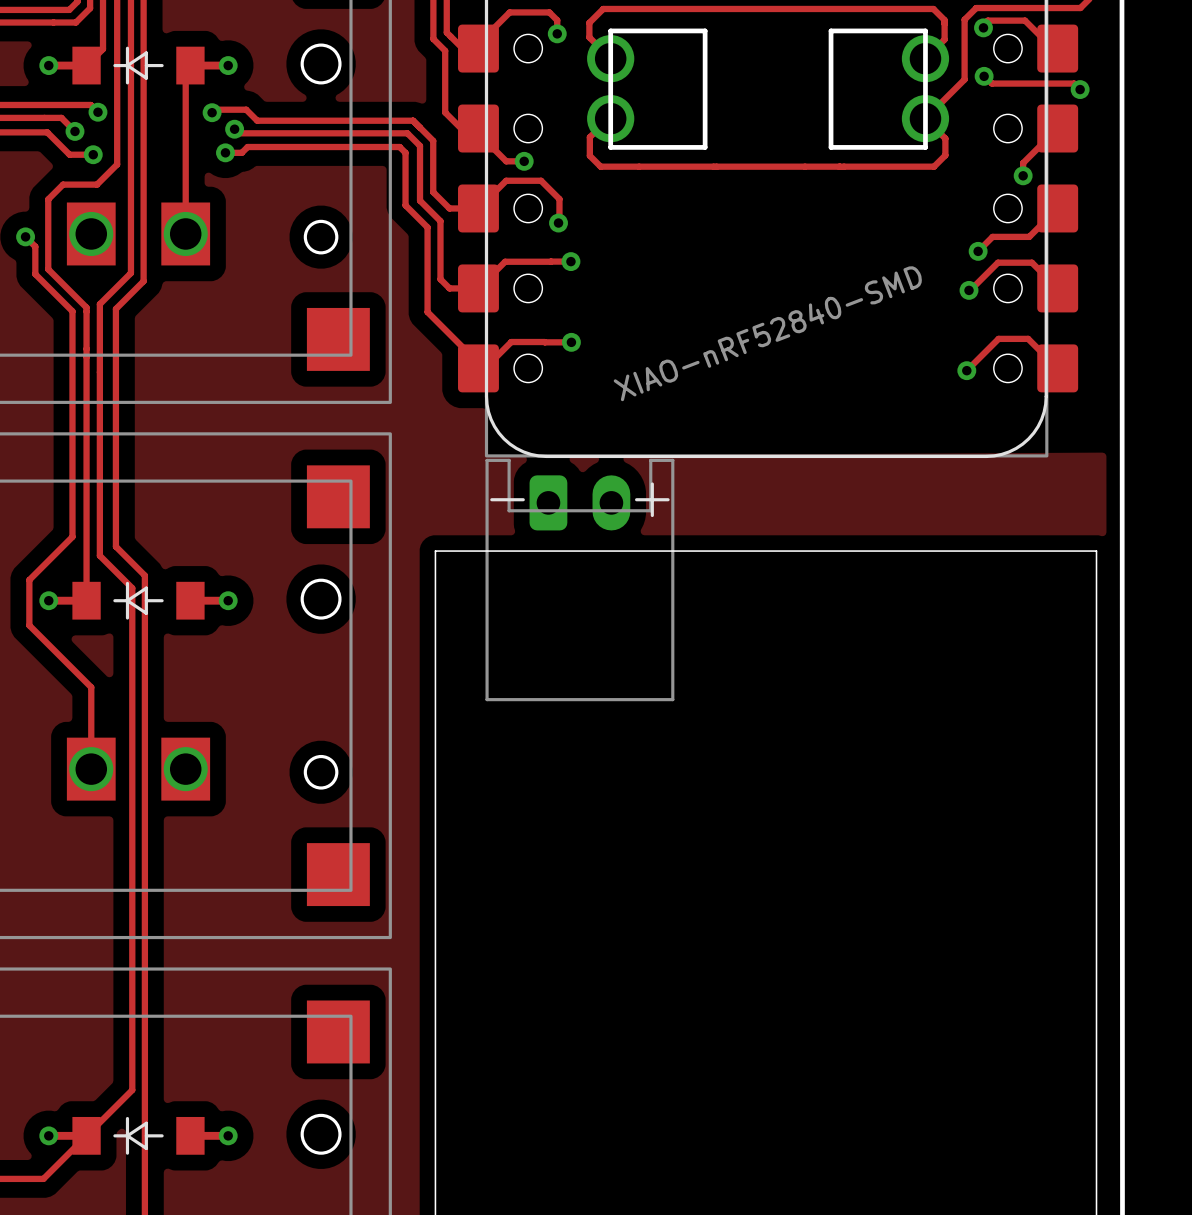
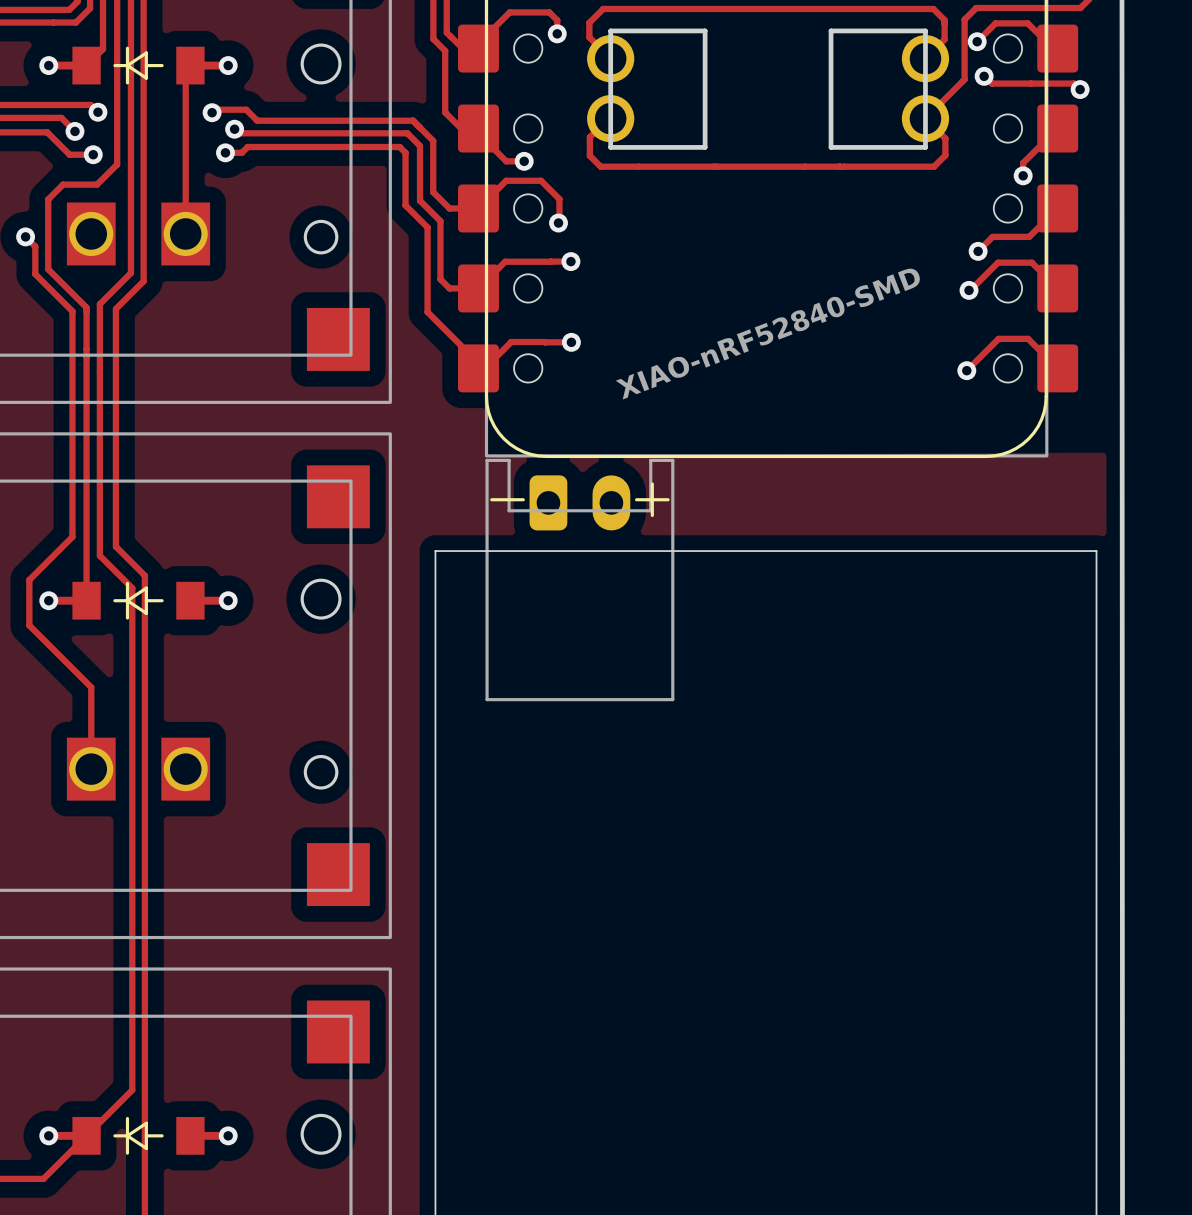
track: (1027, 23) (1025, 20) (987, 20) (983, 27) -> (1027, 23) (995, 23) (977, 41)
via position: (983, 27) -> (977, 41)

